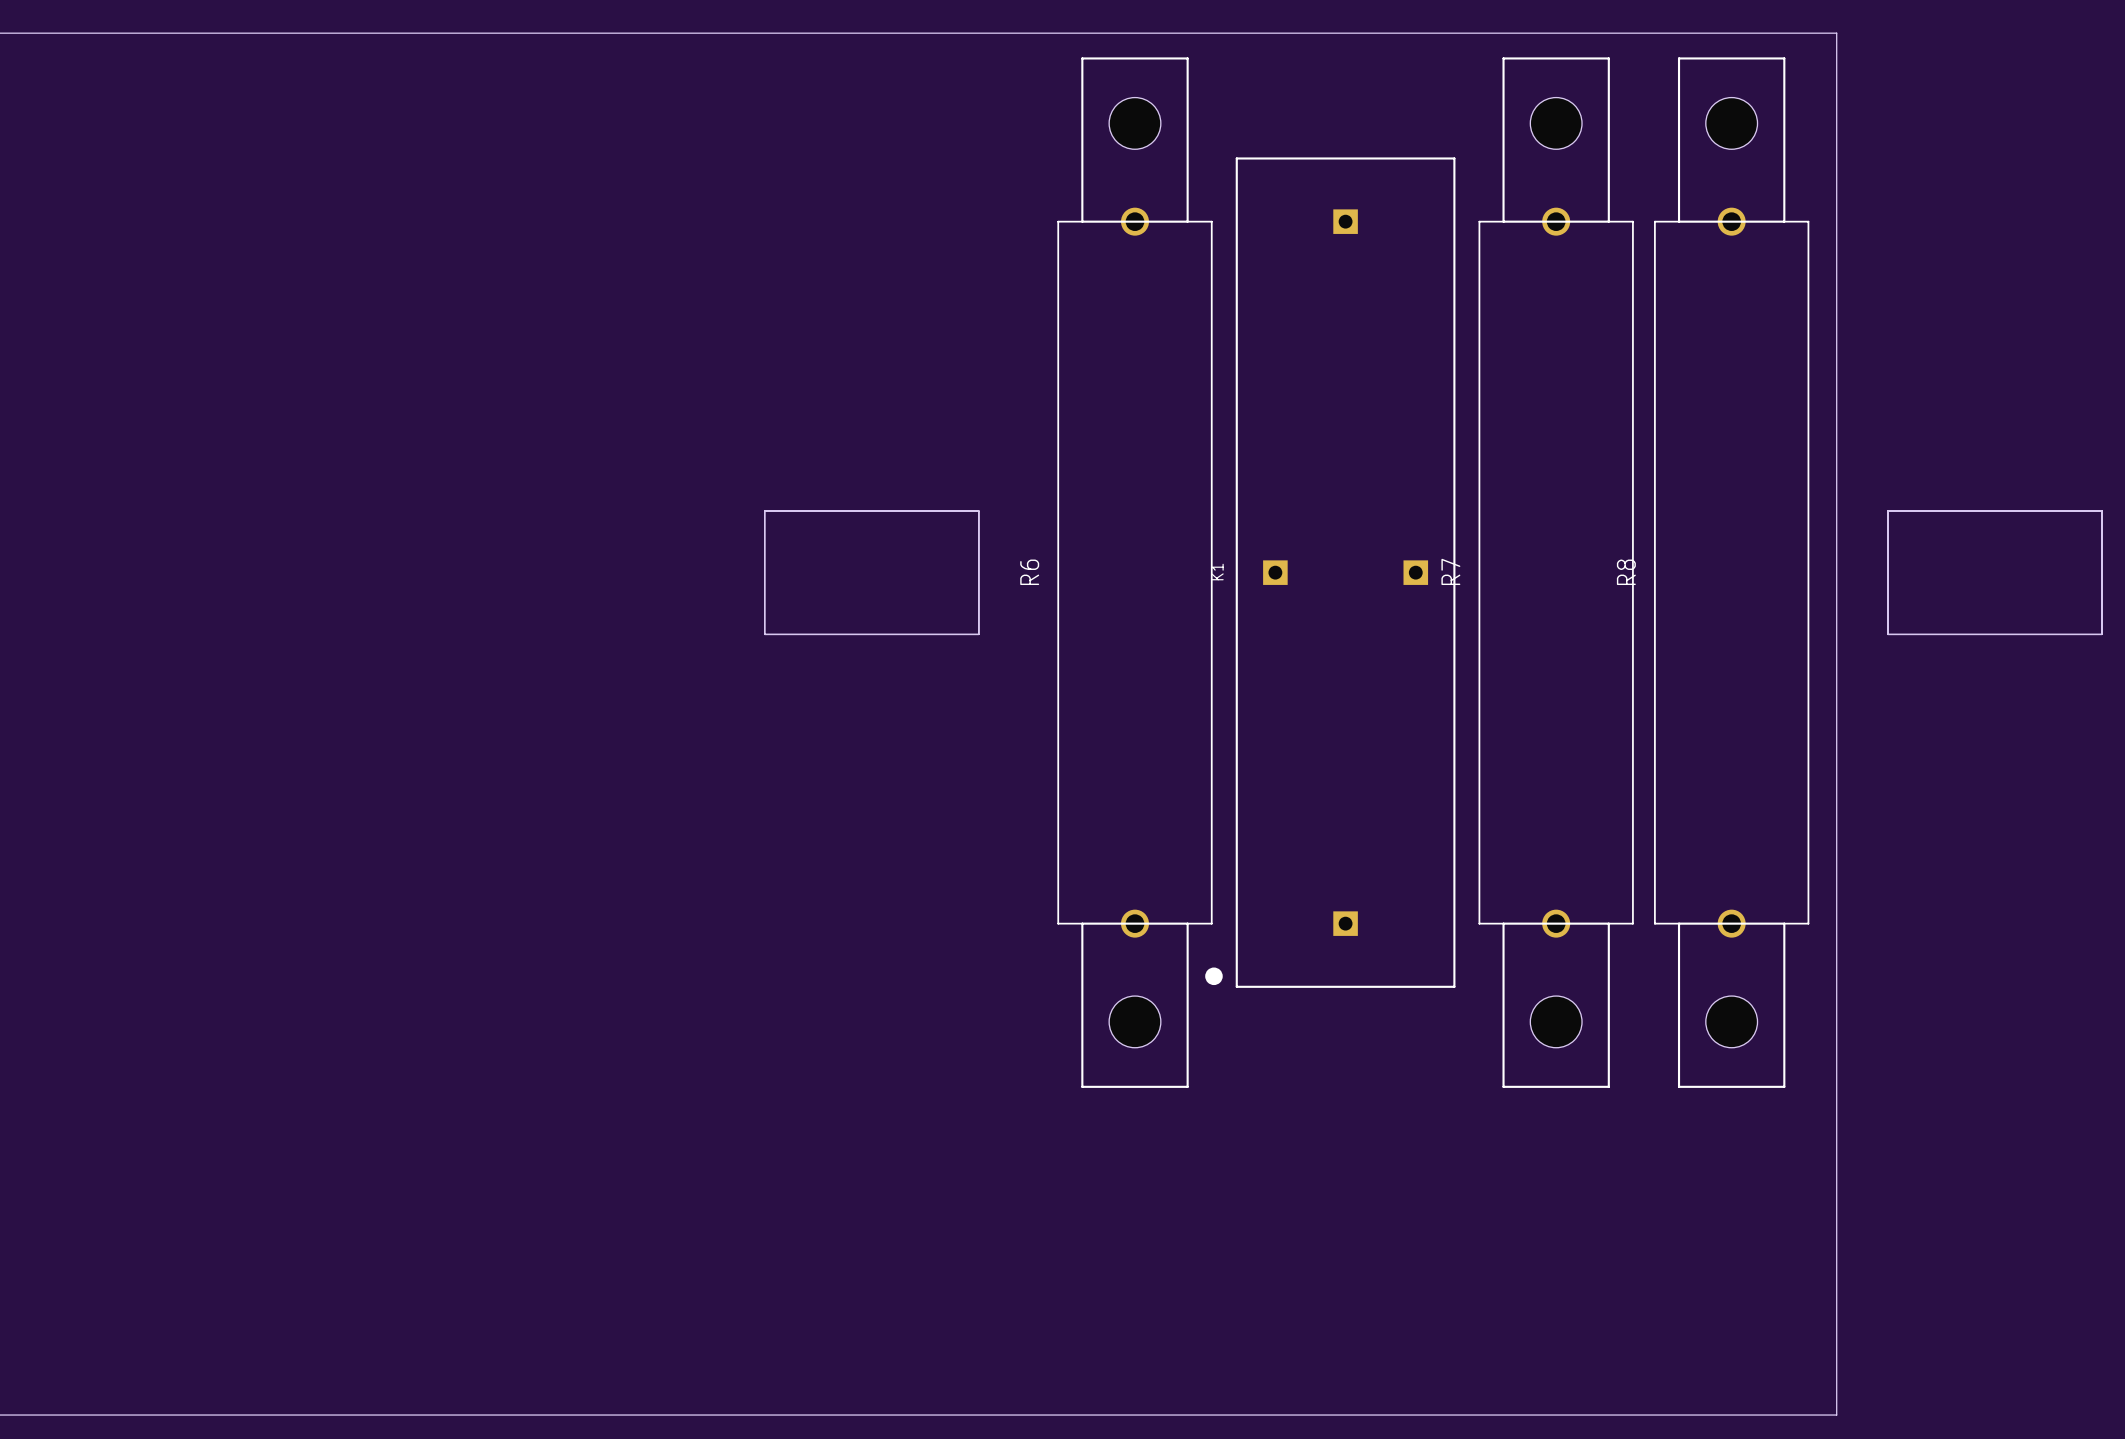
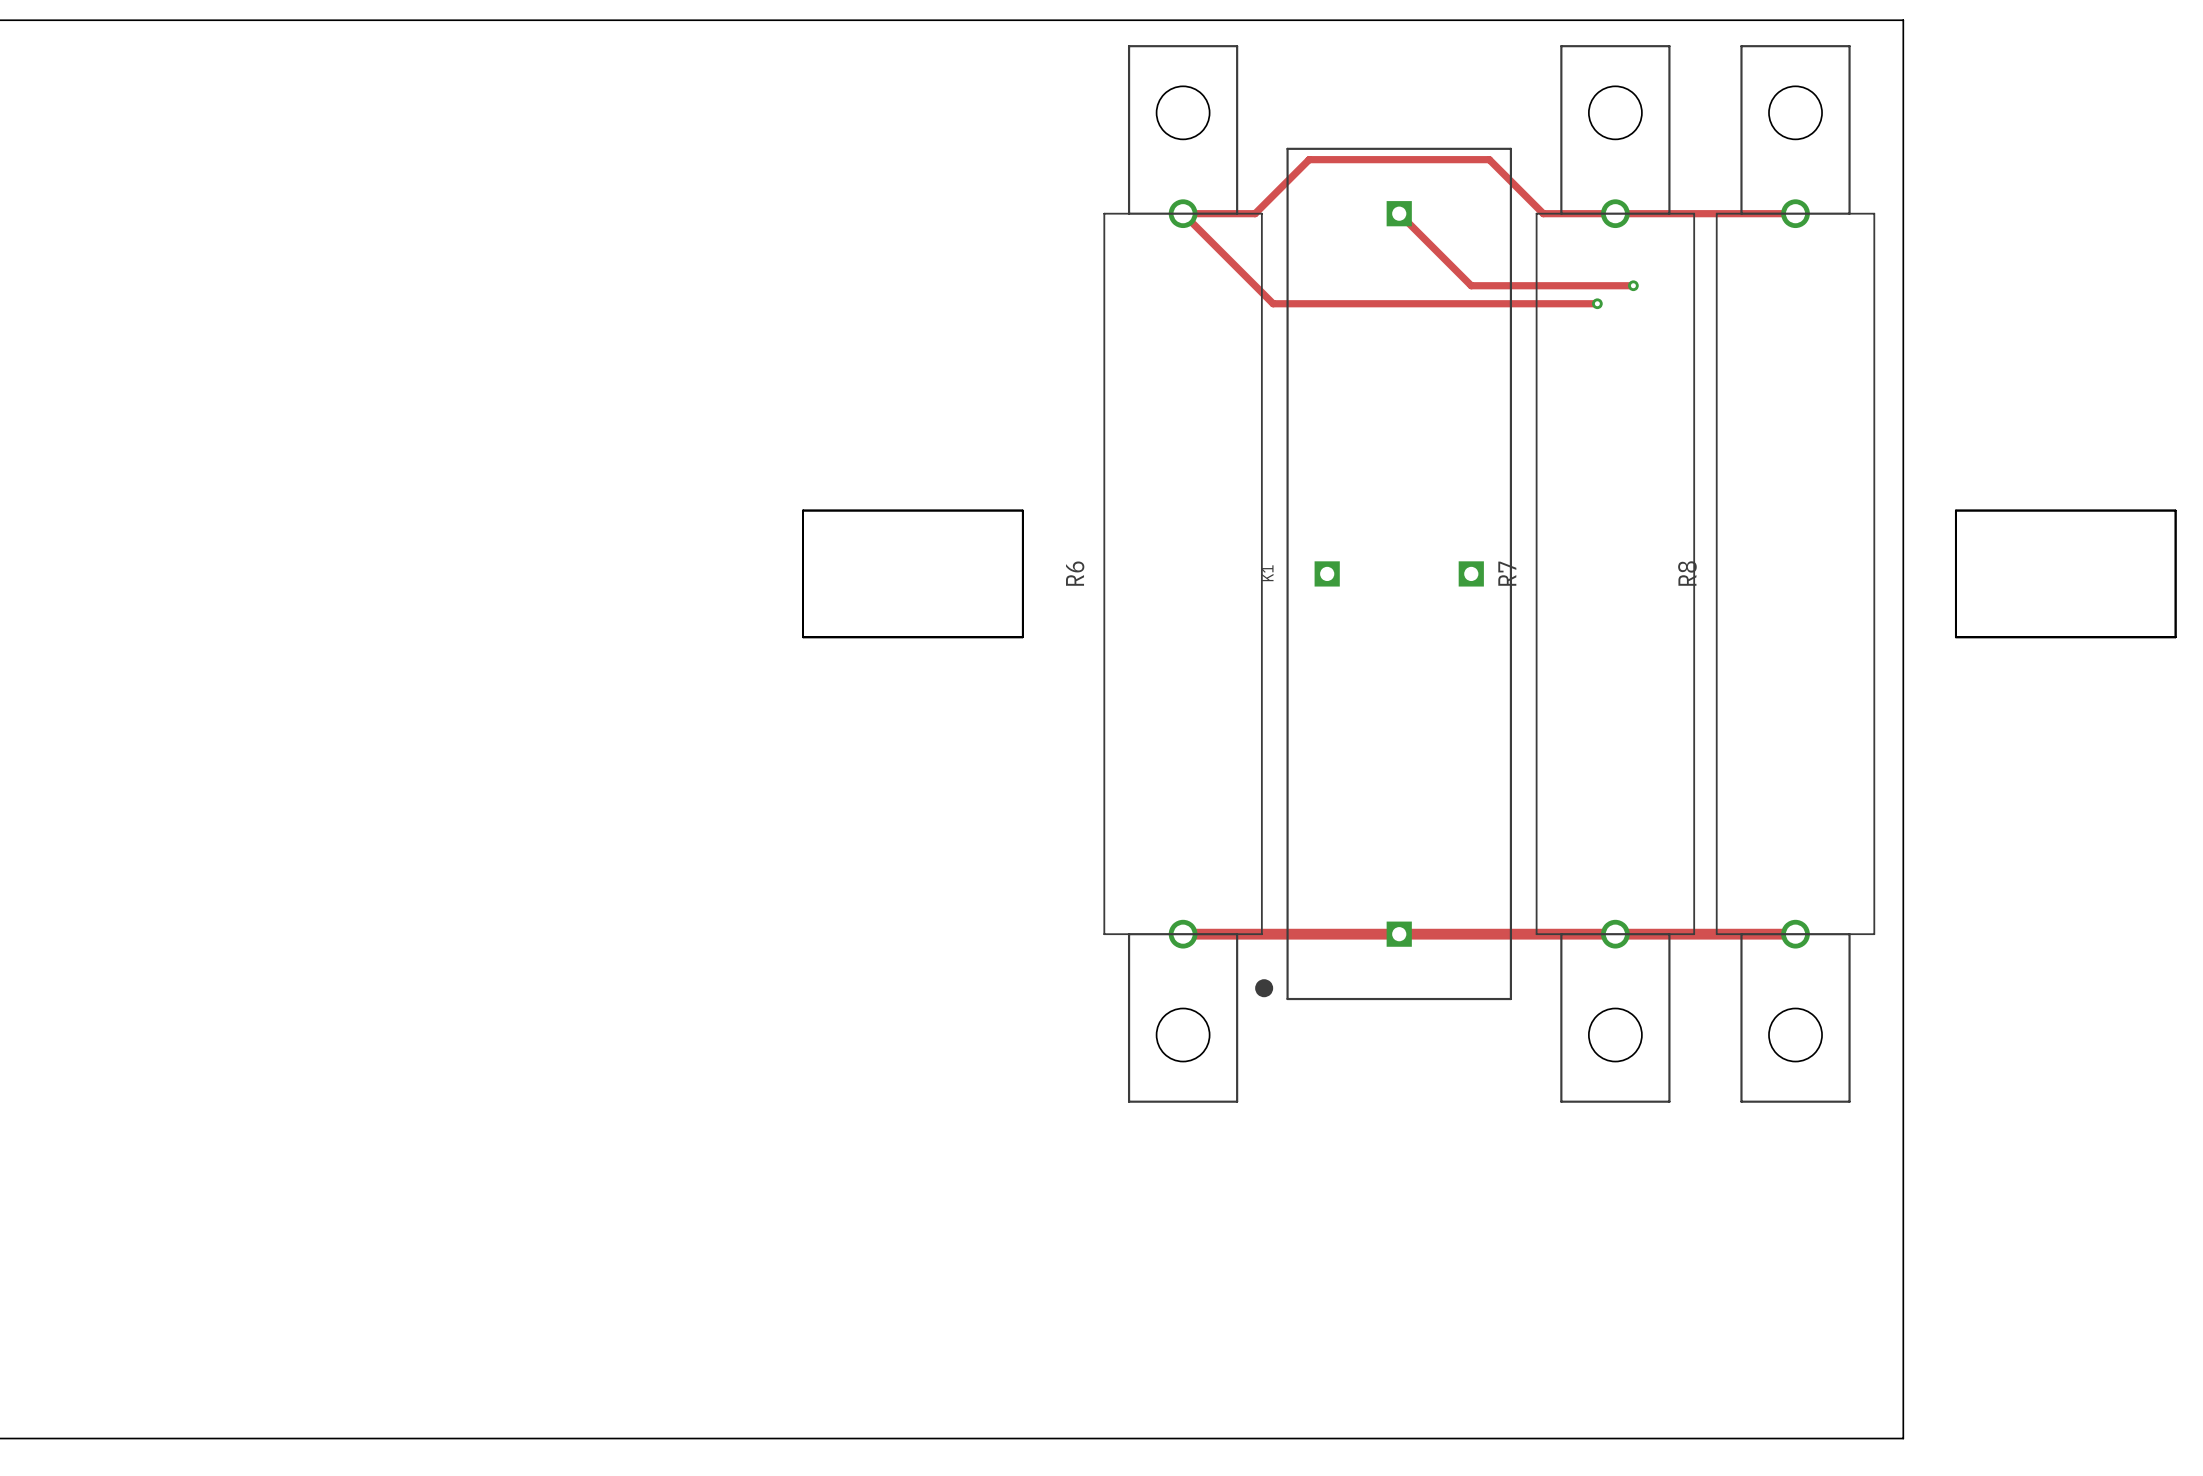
track: none -> (1399, 213) (1471, 285) (1633, 285)
track: none -> (1795, 213) (1543, 213) (1489, 159) (1309, 159) (1255, 213) (1183, 213) (1273, 303) (1597, 303)
via: none -> (1633, 285)
via: none -> (1597, 303)
track: none -> (1183, 934) (1795, 934)

